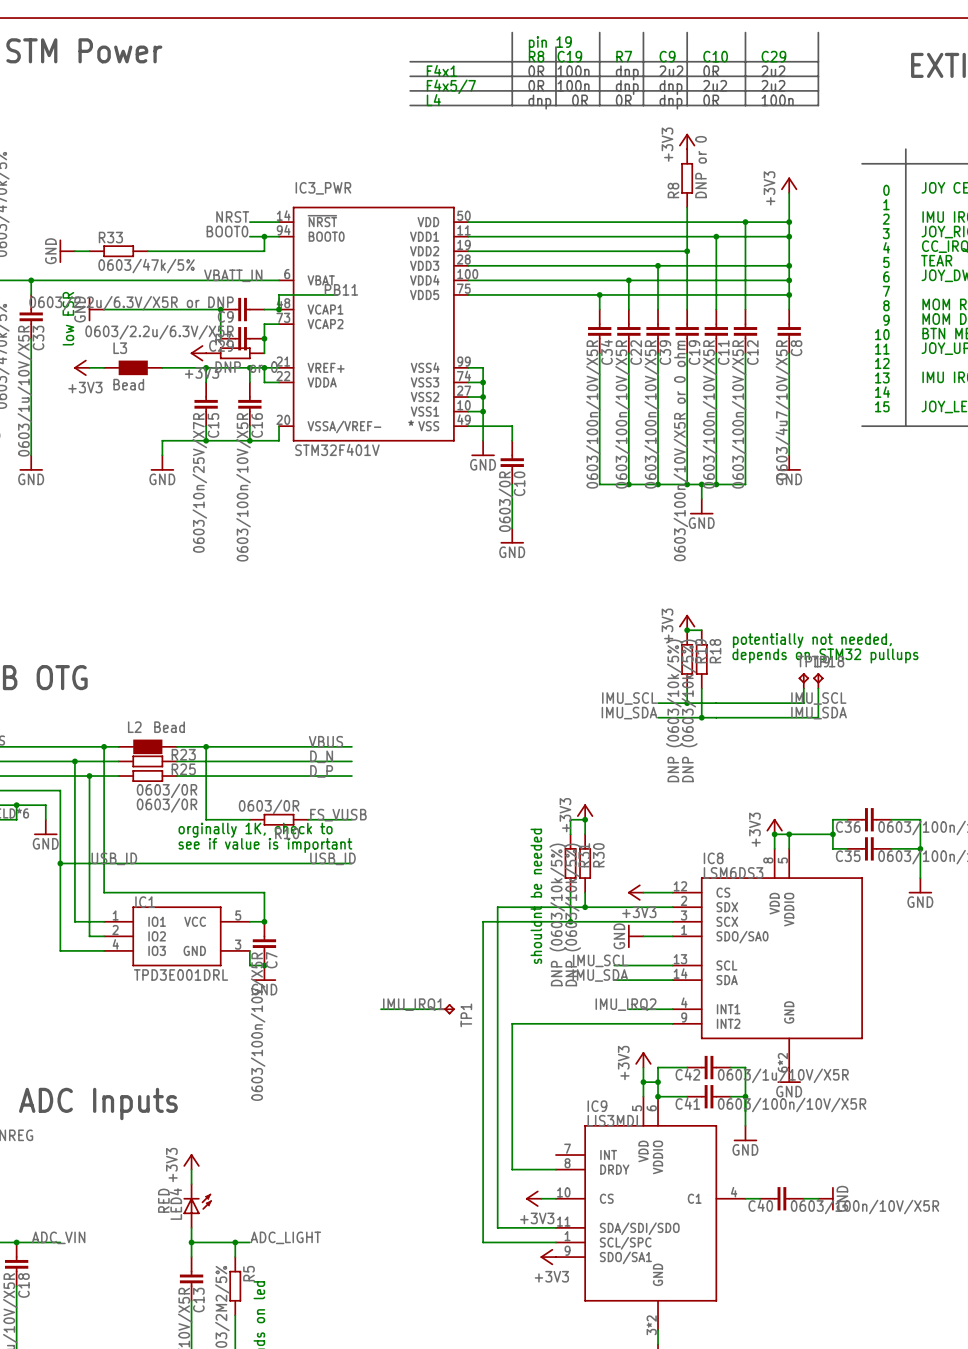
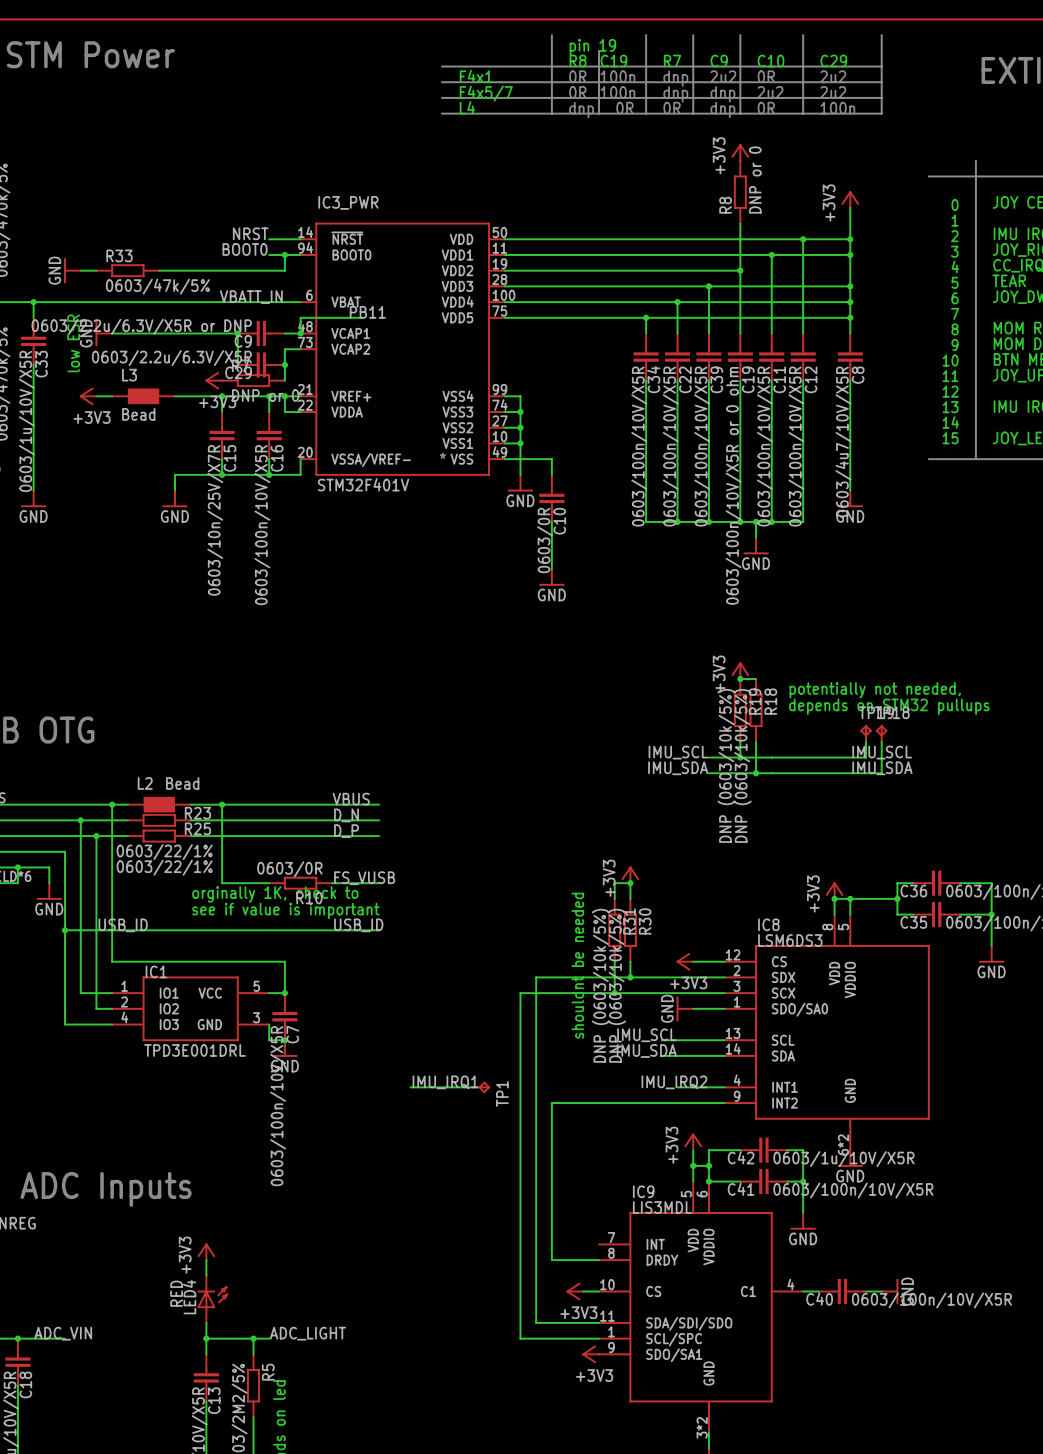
R23 value: 0603/0R (167, 790) -> 0603/22/1% (164, 852)
R25 value: 0603/0R (167, 805) -> 0603/22/1% (164, 867)

